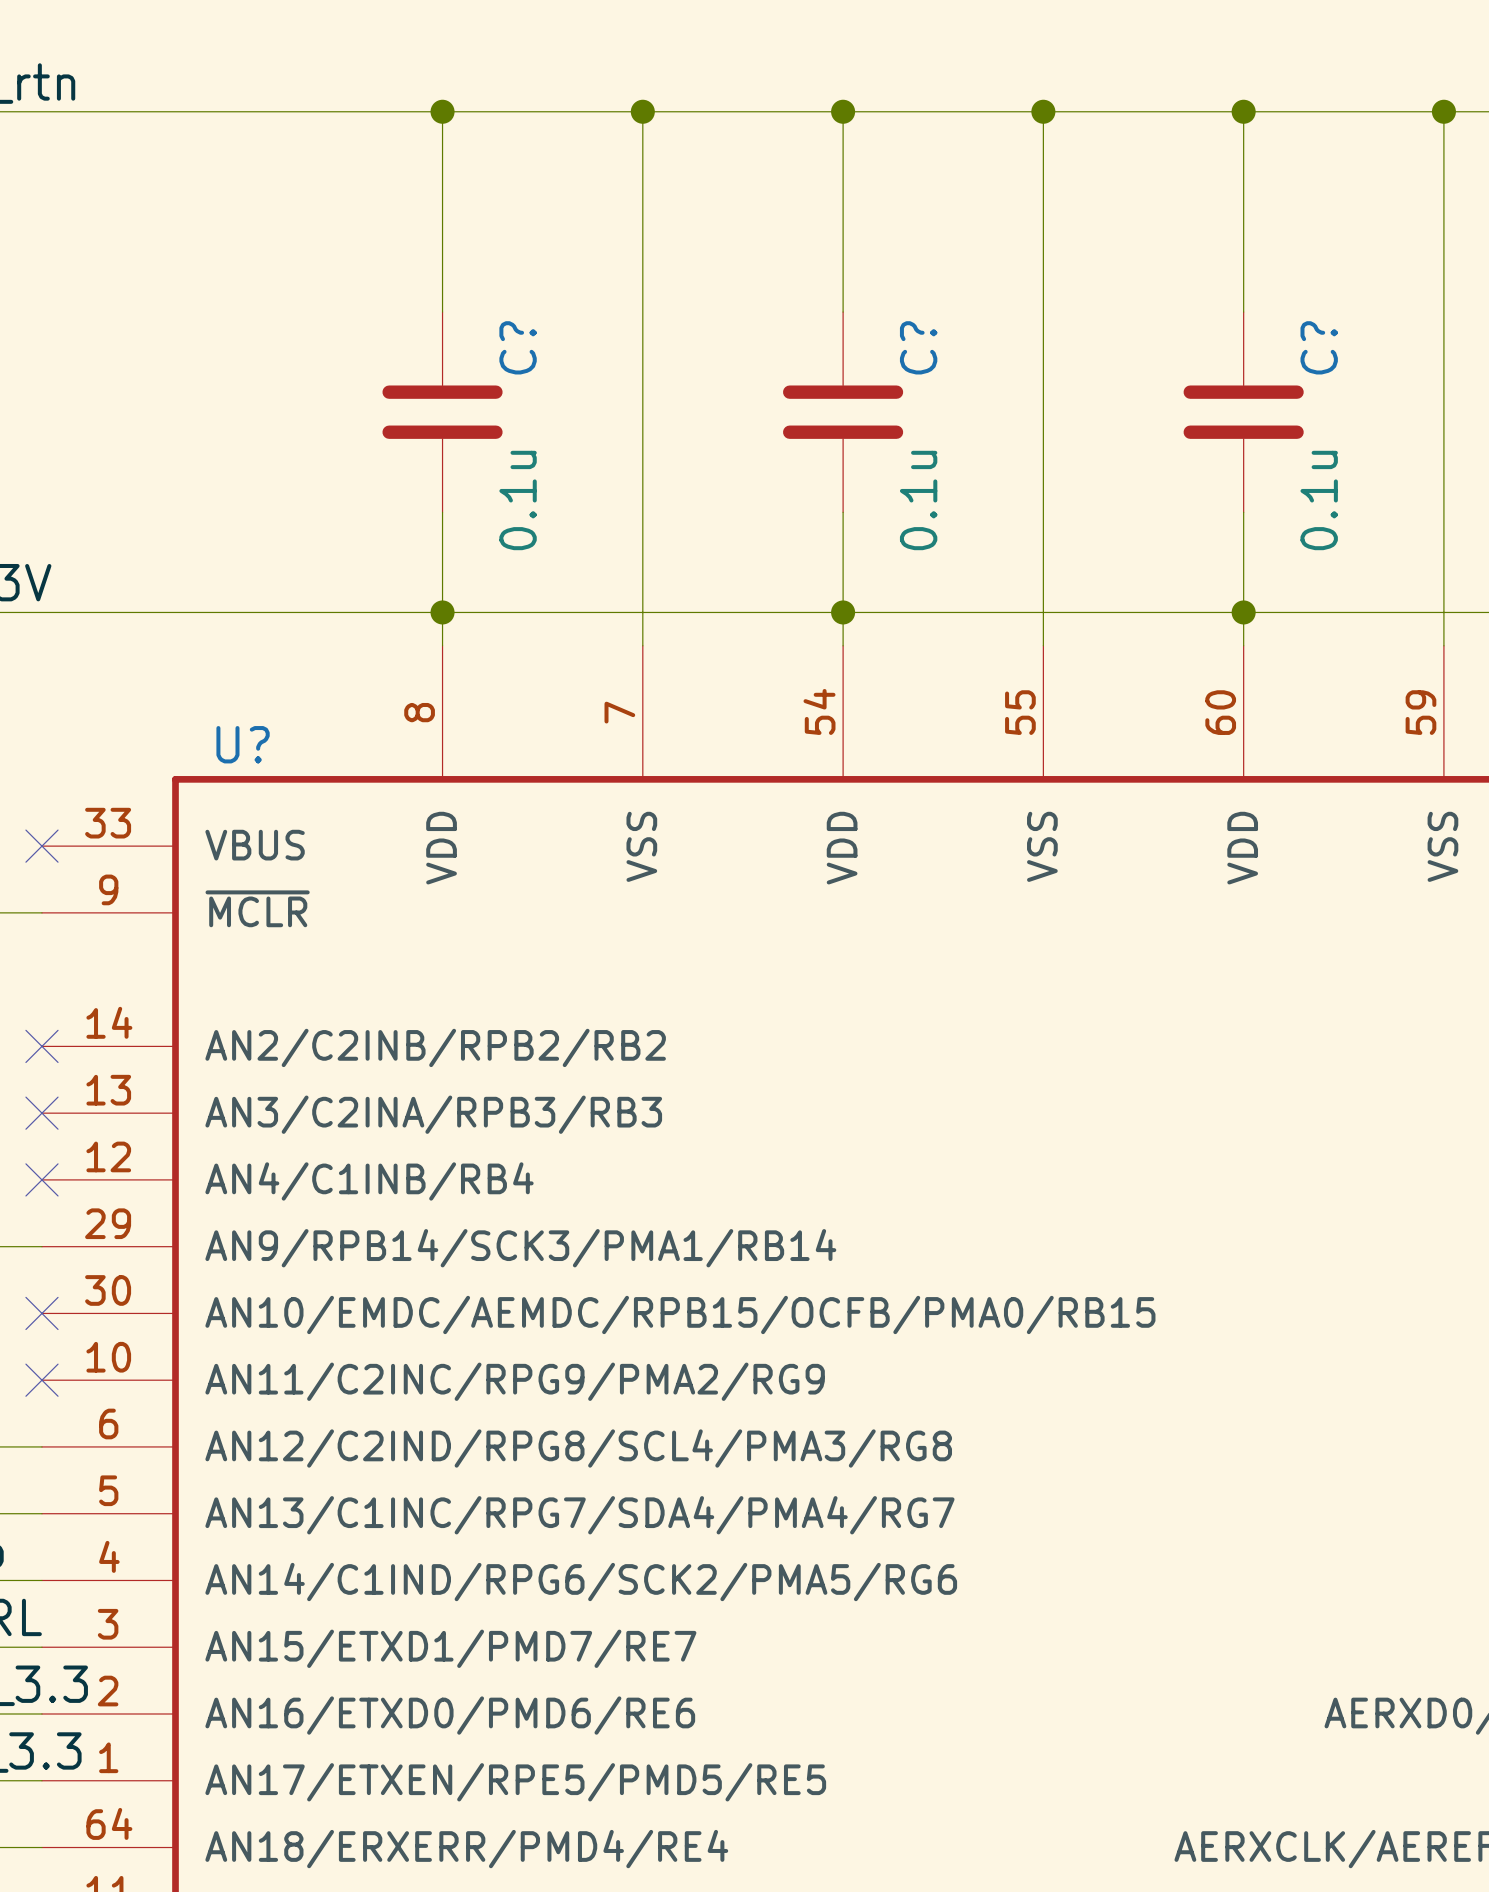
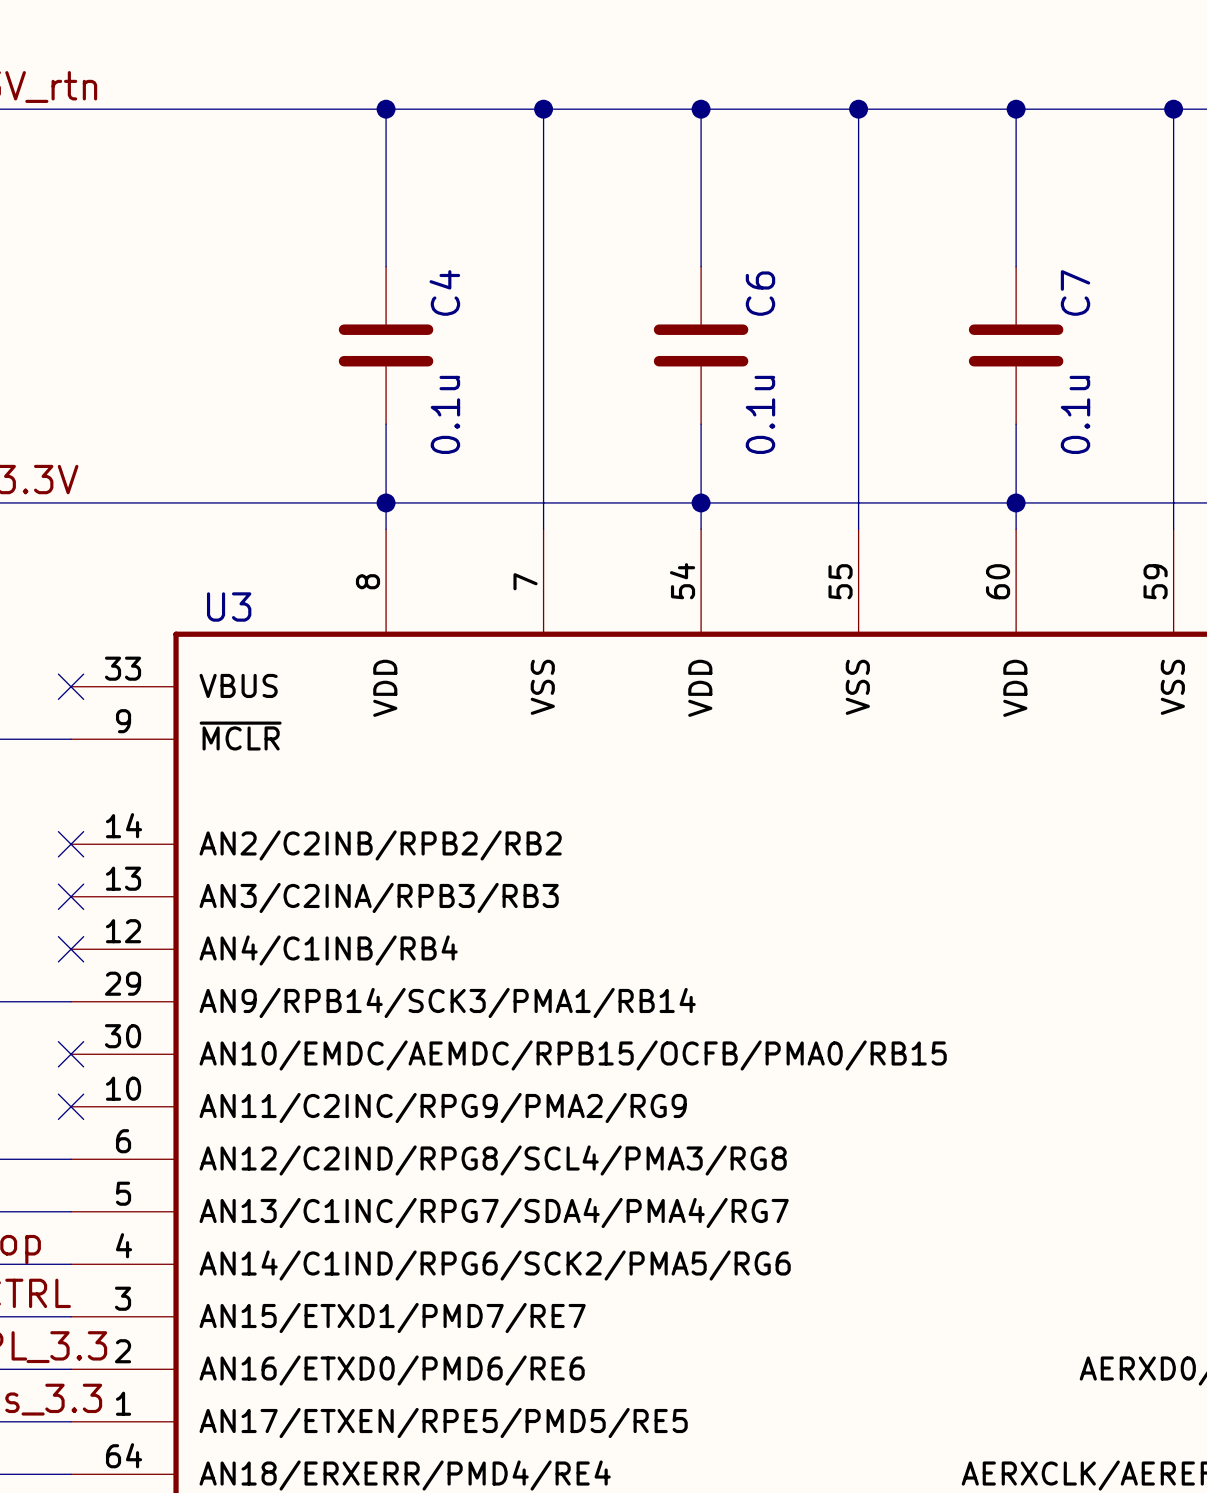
C? name: C? (518, 347) -> C4 (444, 292)
C? name: C? (918, 347) -> C6 (760, 293)
C? name: C? (1319, 347) -> C7 (1075, 292)
U? name: U? (243, 744) -> U3 (229, 607)

